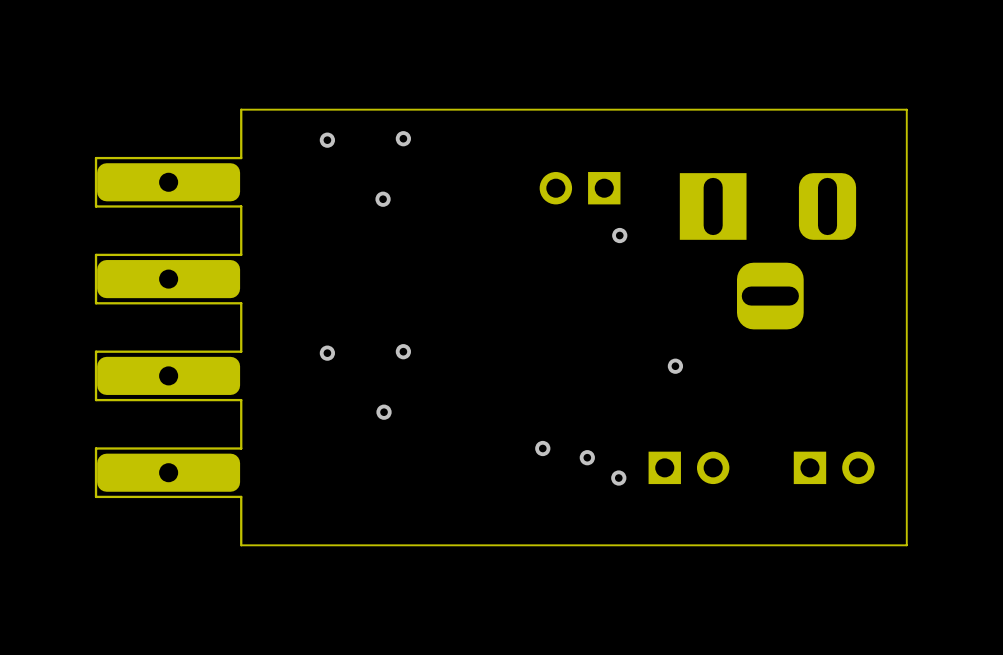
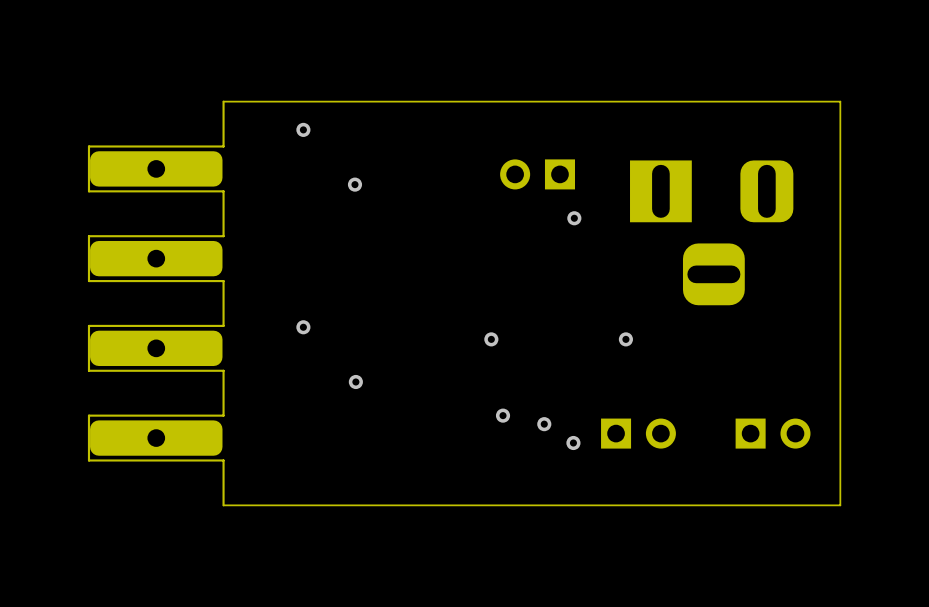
via: (403, 138) -> none
via: (403, 351) -> none
via: none -> (491, 339)

